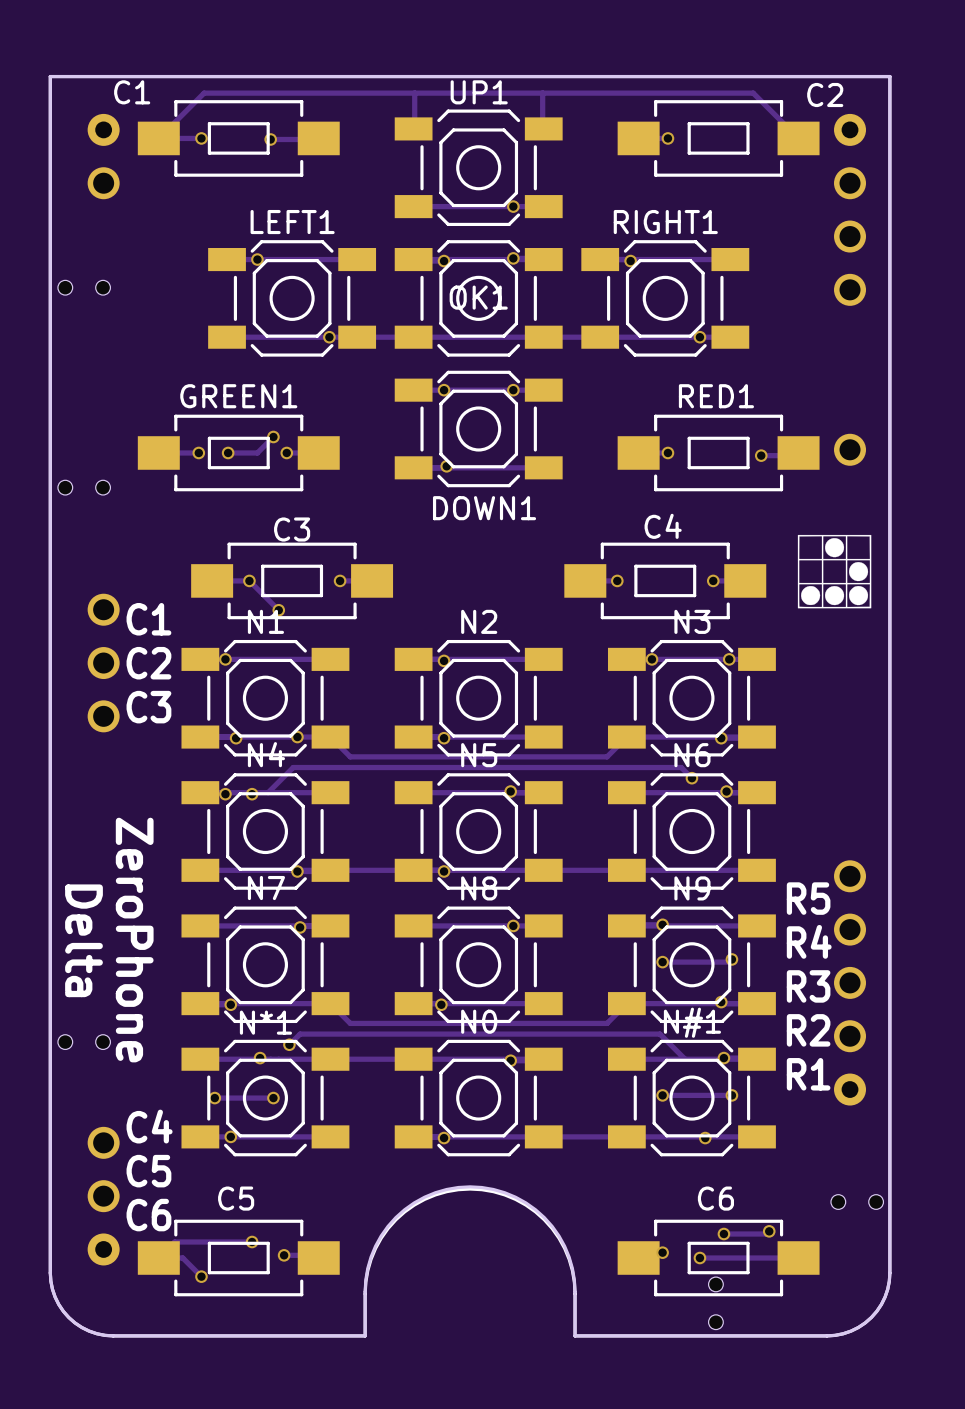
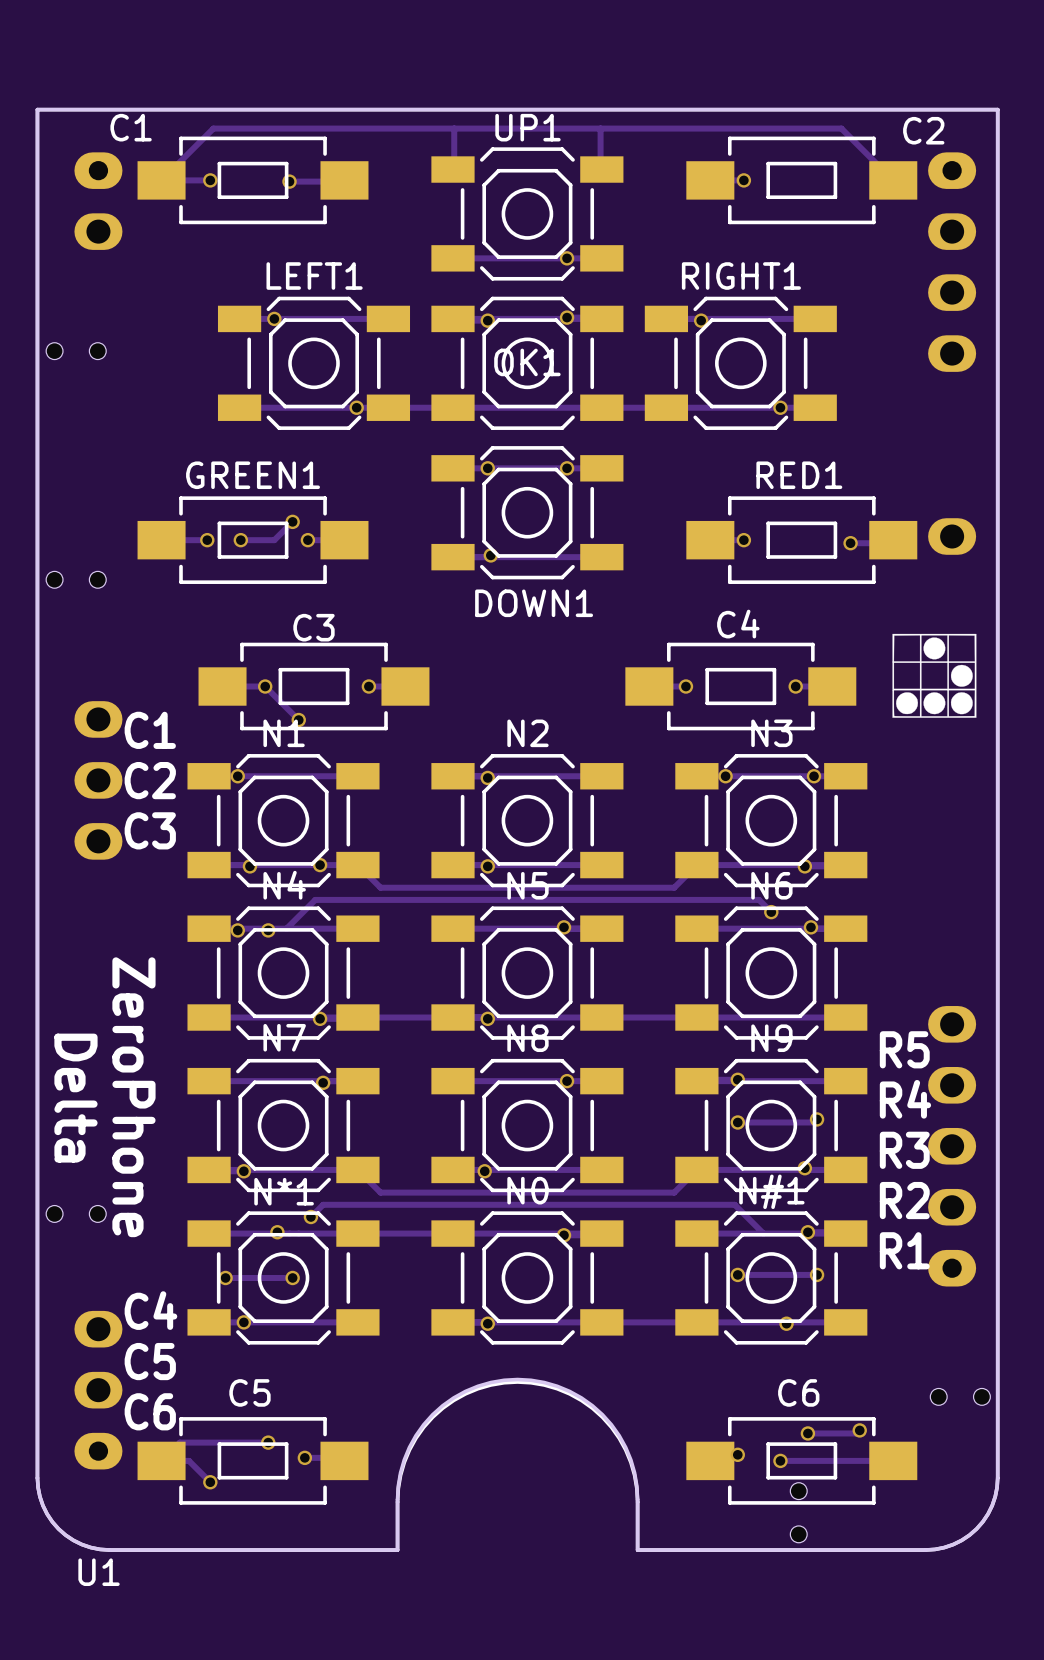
part: (470, 706) -> none
U1: none -> (517, 829)

